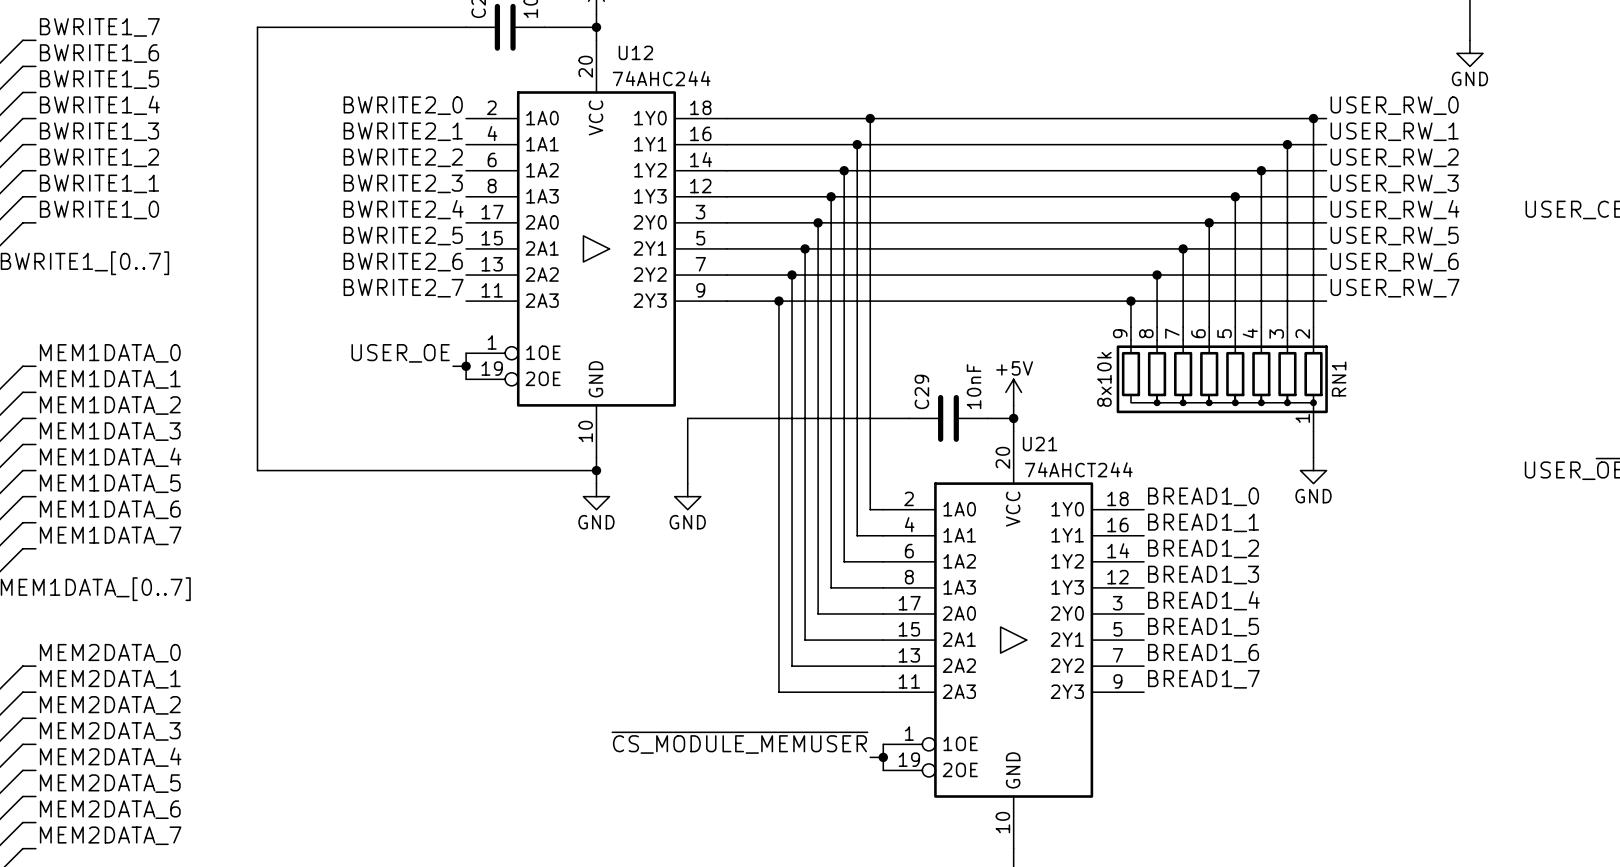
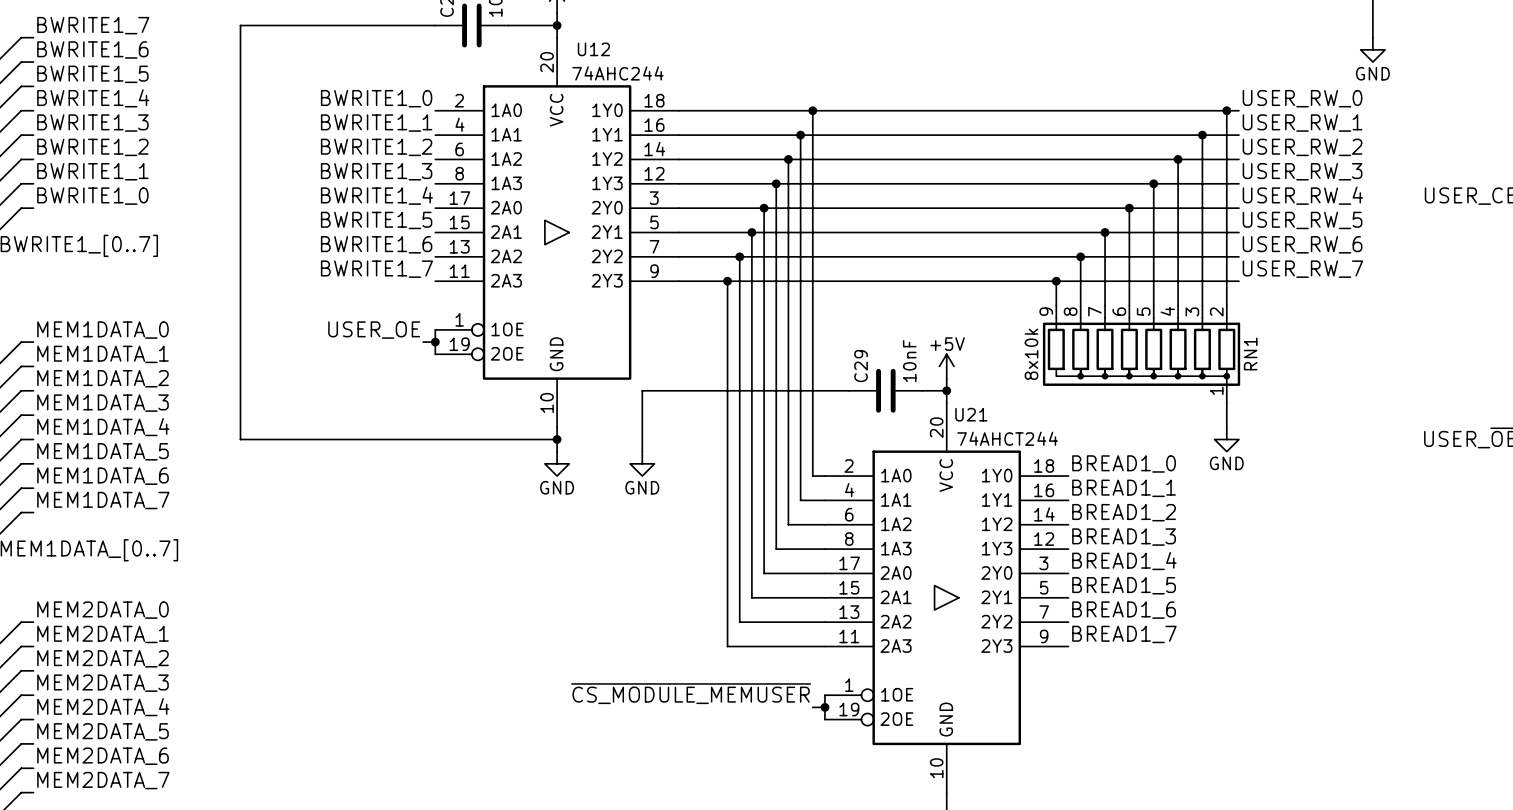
label: BWRITE2_0 (403, 105) -> BWRITE1_0 (376, 98)
label: BWRITE2_1 (403, 131) -> BWRITE1_1 (376, 123)
label: BWRITE2_2 (403, 157) -> BWRITE1_2 (376, 147)
label: BWRITE2_3 (403, 183) -> BWRITE1_3 (376, 171)
label: BWRITE2_4 (403, 209) -> BWRITE1_4 (376, 195)
label: BWRITE2_5 (403, 236) -> BWRITE1_5 (376, 220)
label: BWRITE2_6 (403, 262) -> BWRITE1_6 (376, 244)
label: BWRITE2_7 (403, 288) -> BWRITE1_7 (376, 269)

